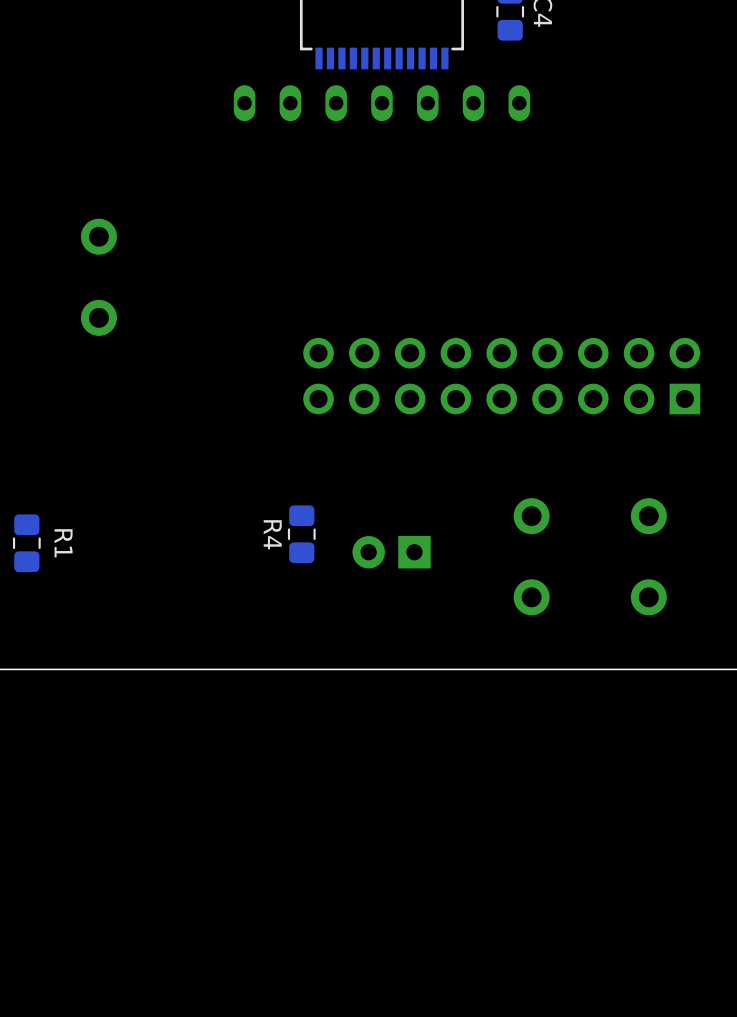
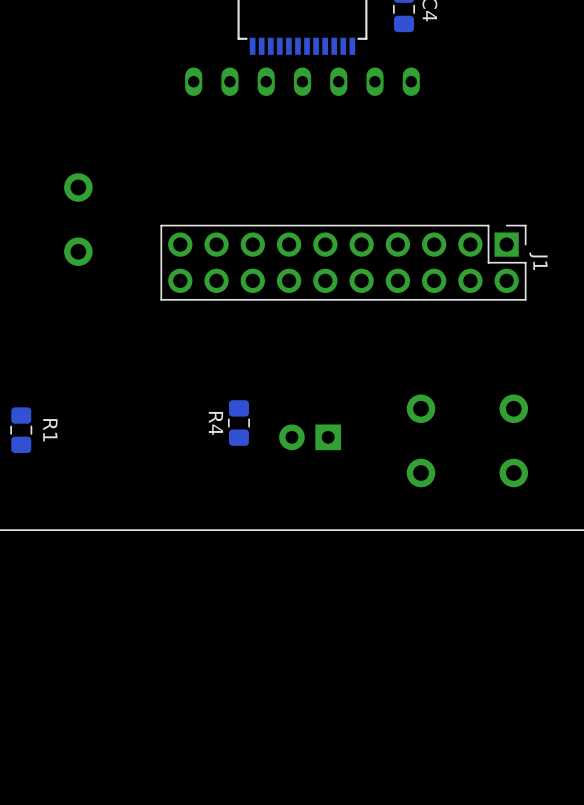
J1: none -> (343, 262)
part: (501, 376) -> none

